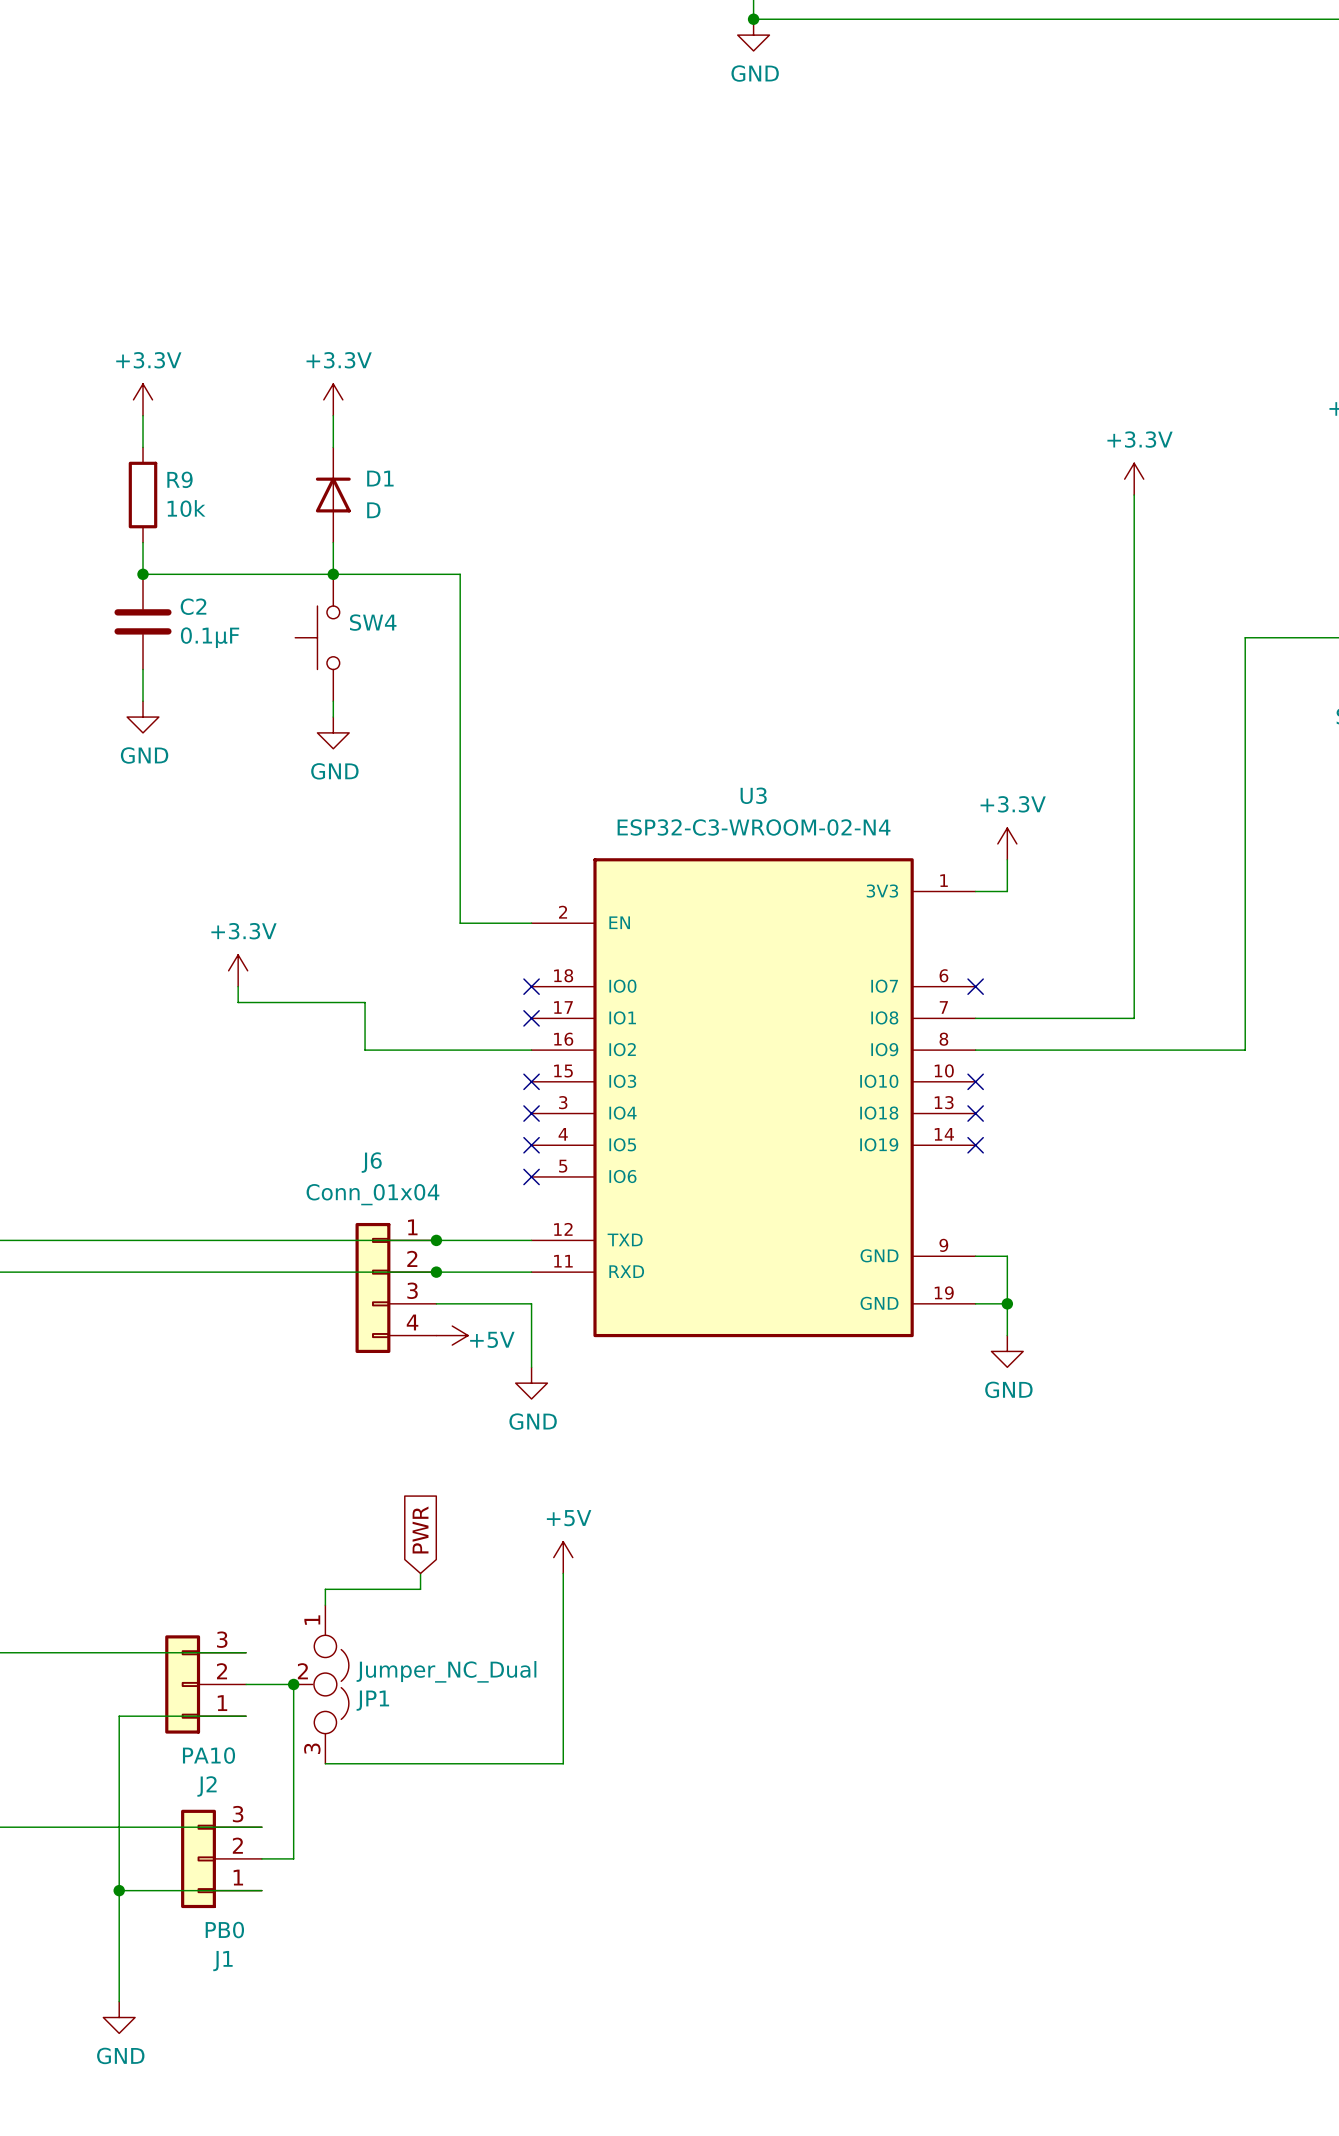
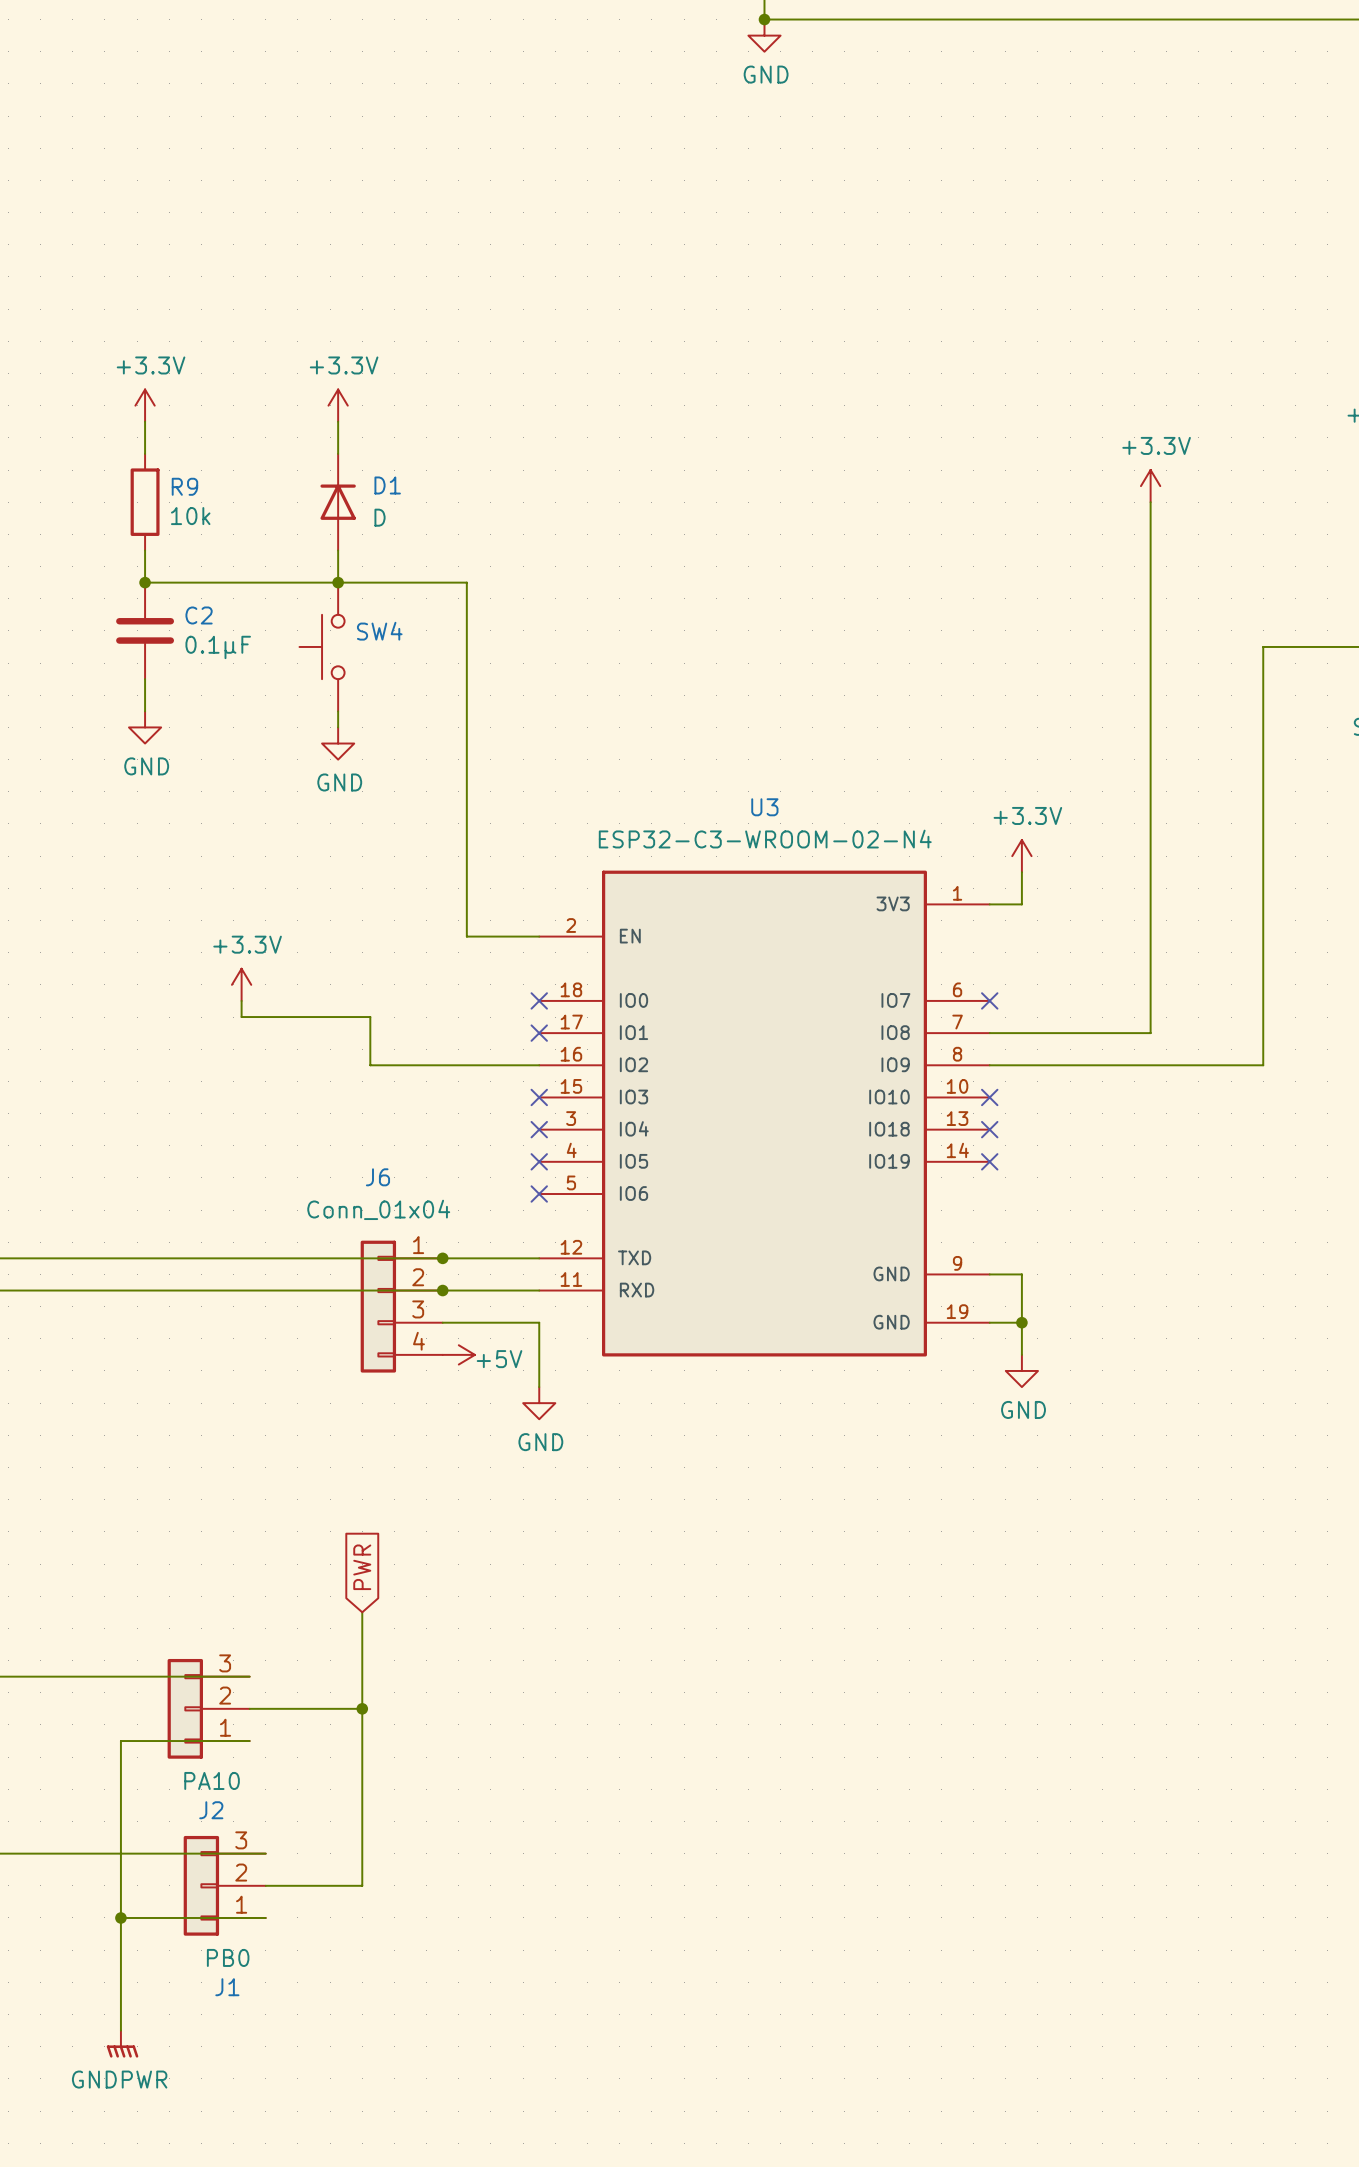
global label position: PWR (420, 1529) -> PWR (362, 1567)
power symbol: +5V (563, 1557) -> none
wire: (420, 1573) (420, 1589) (325, 1589) (325, 1605) -> none
wire: (563, 1573) (563, 1763) (325, 1763) -> none
wire: (293, 1684) (293, 1858) -> (362, 1612) (362, 1885) (297, 1885)
wire: none -> (297, 1708) (362, 1708)
junction position: (293, 1684) -> (362, 1708)
JP1: Jumper_NC_Dual (321, 1684) -> none
power symbol: GND (119, 2017) -> GNDPWR (122, 2044)

